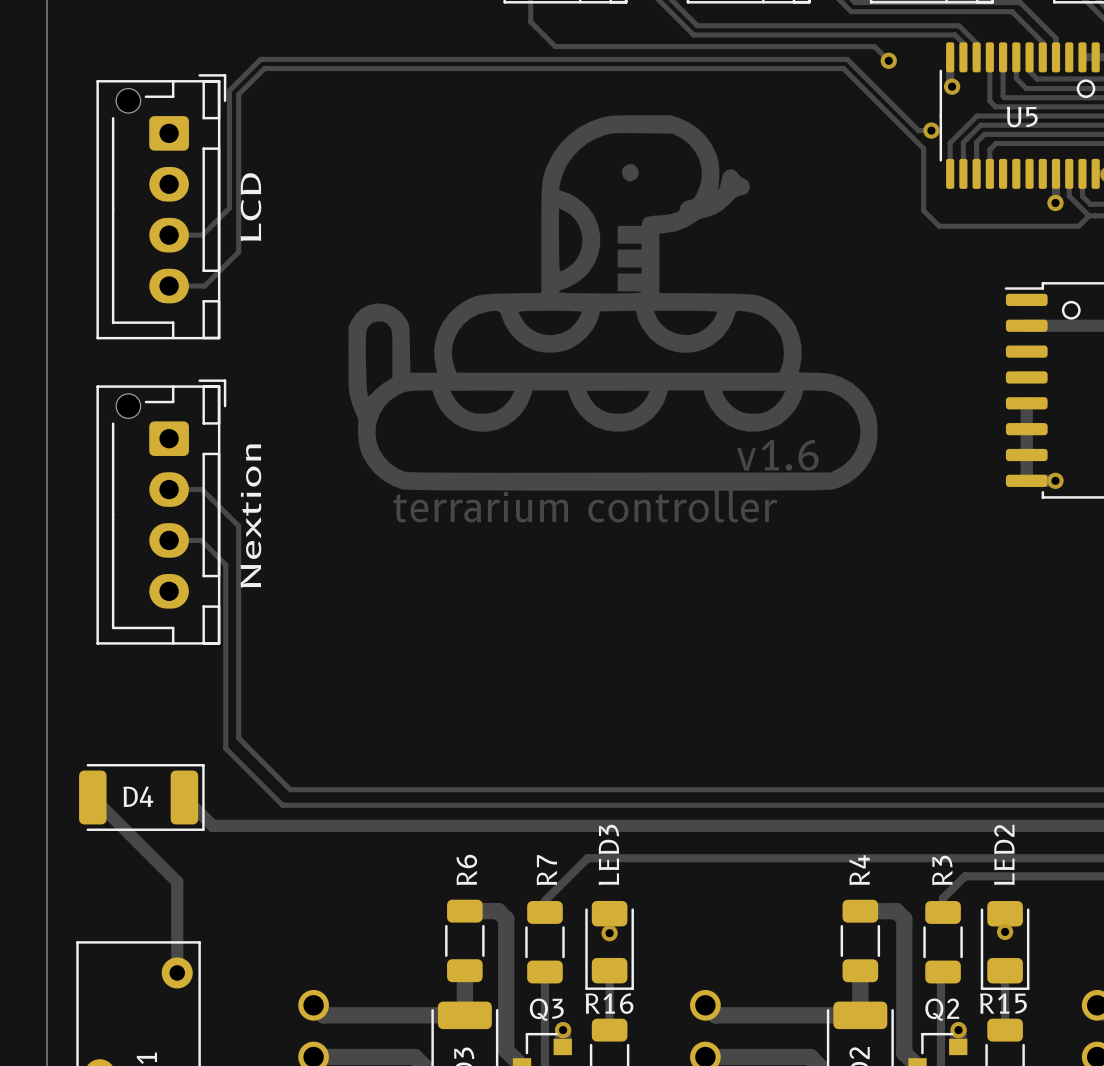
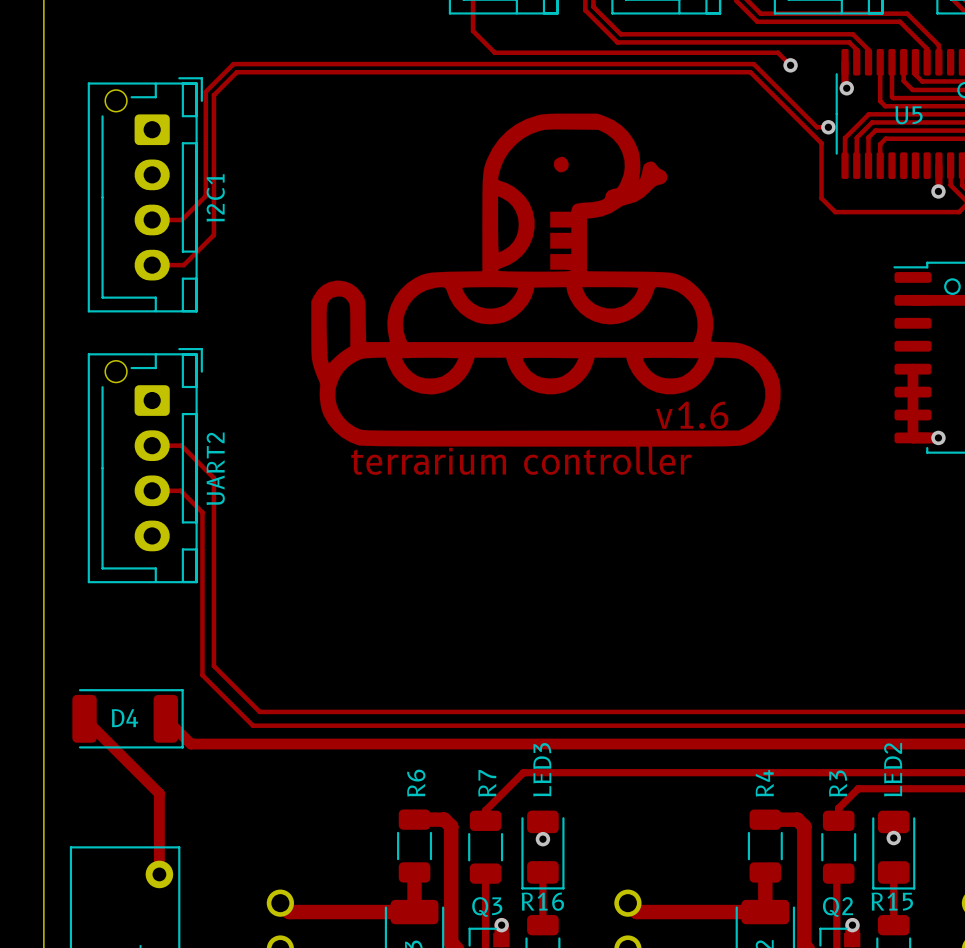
I2C1 value: LCD (250, 207) -> none
I2C1 name: none -> I2C1 (215, 197)
UART2 name: none -> UART2 (215, 468)
UART2 value: Nextion (250, 516) -> none

